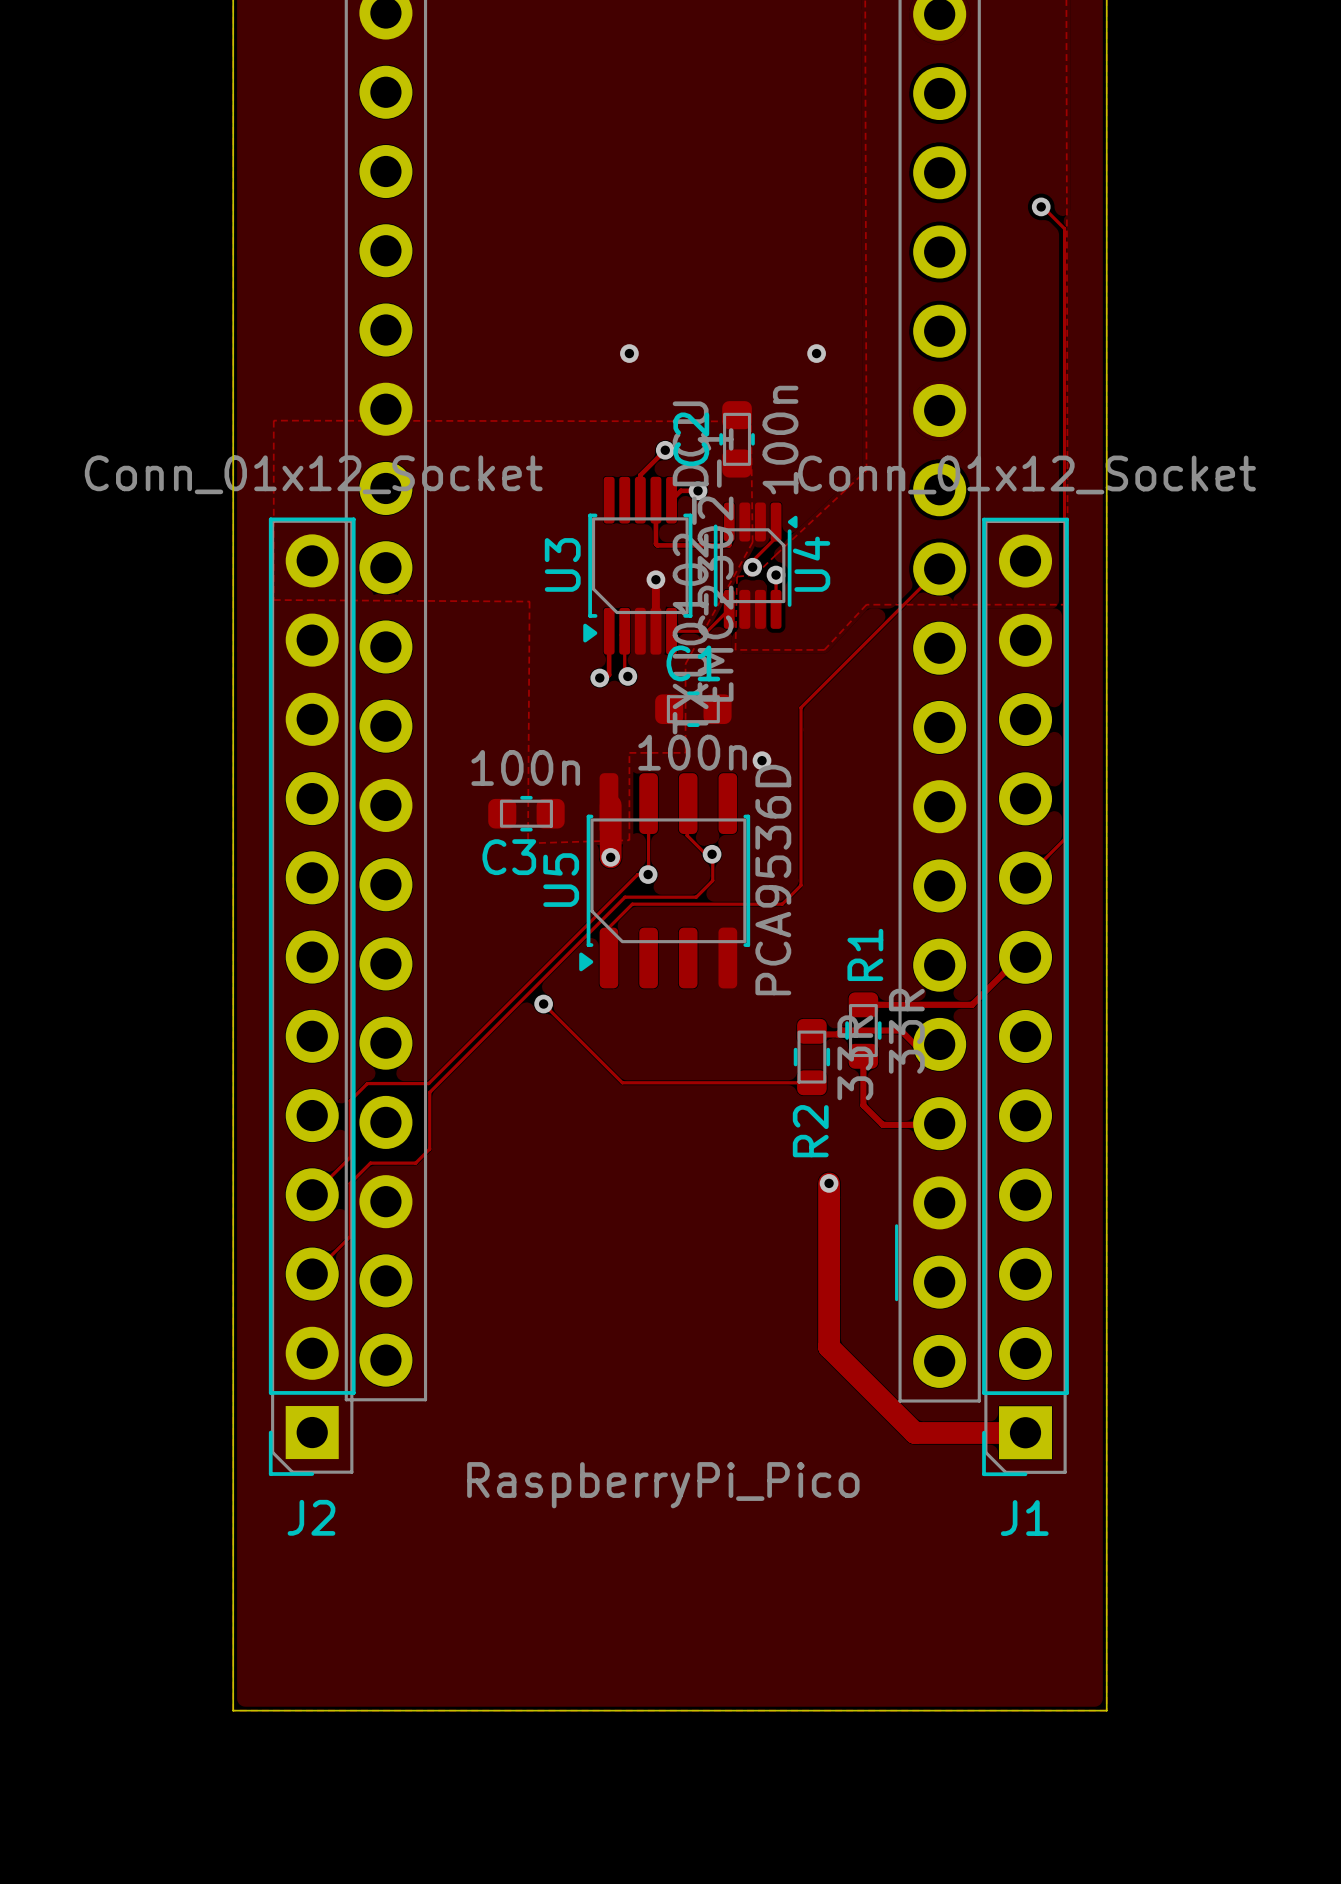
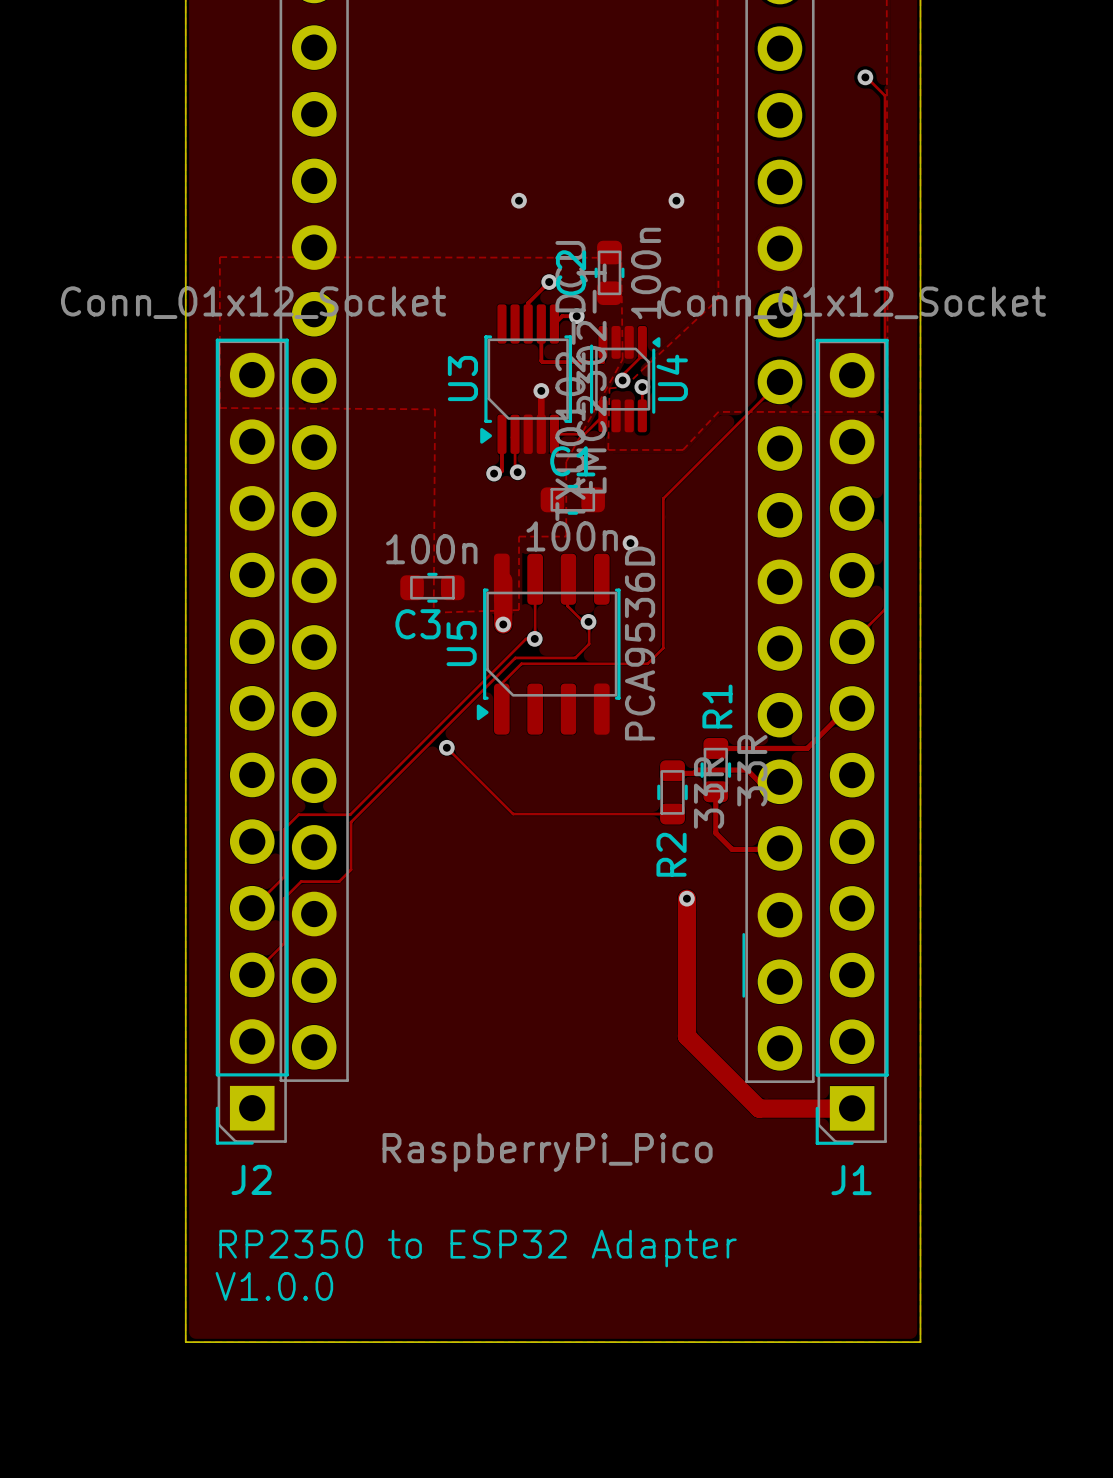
text: none -> RP2350 to ESP32 Adapter (478, 1248)
text: none -> V1.0.0 (274, 1286)

